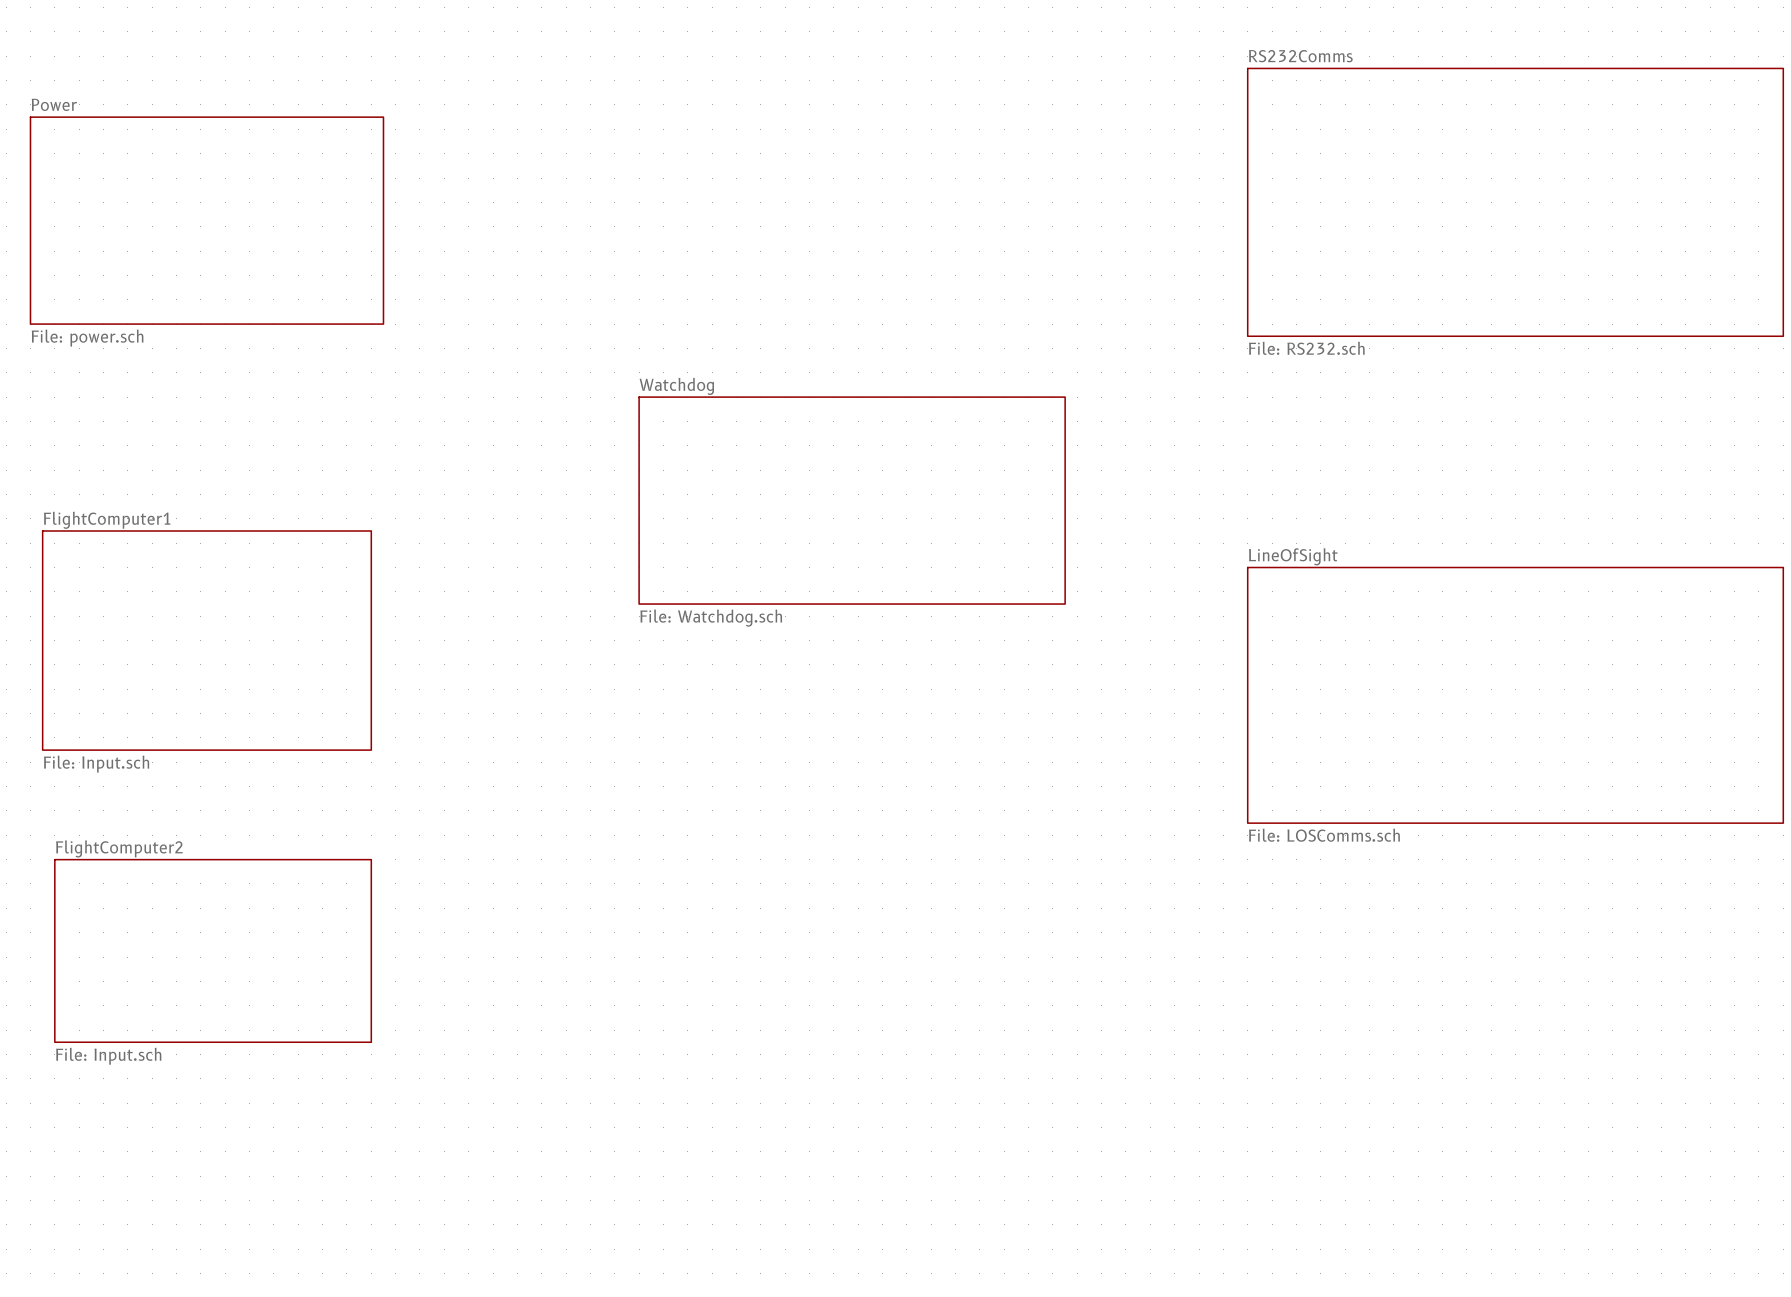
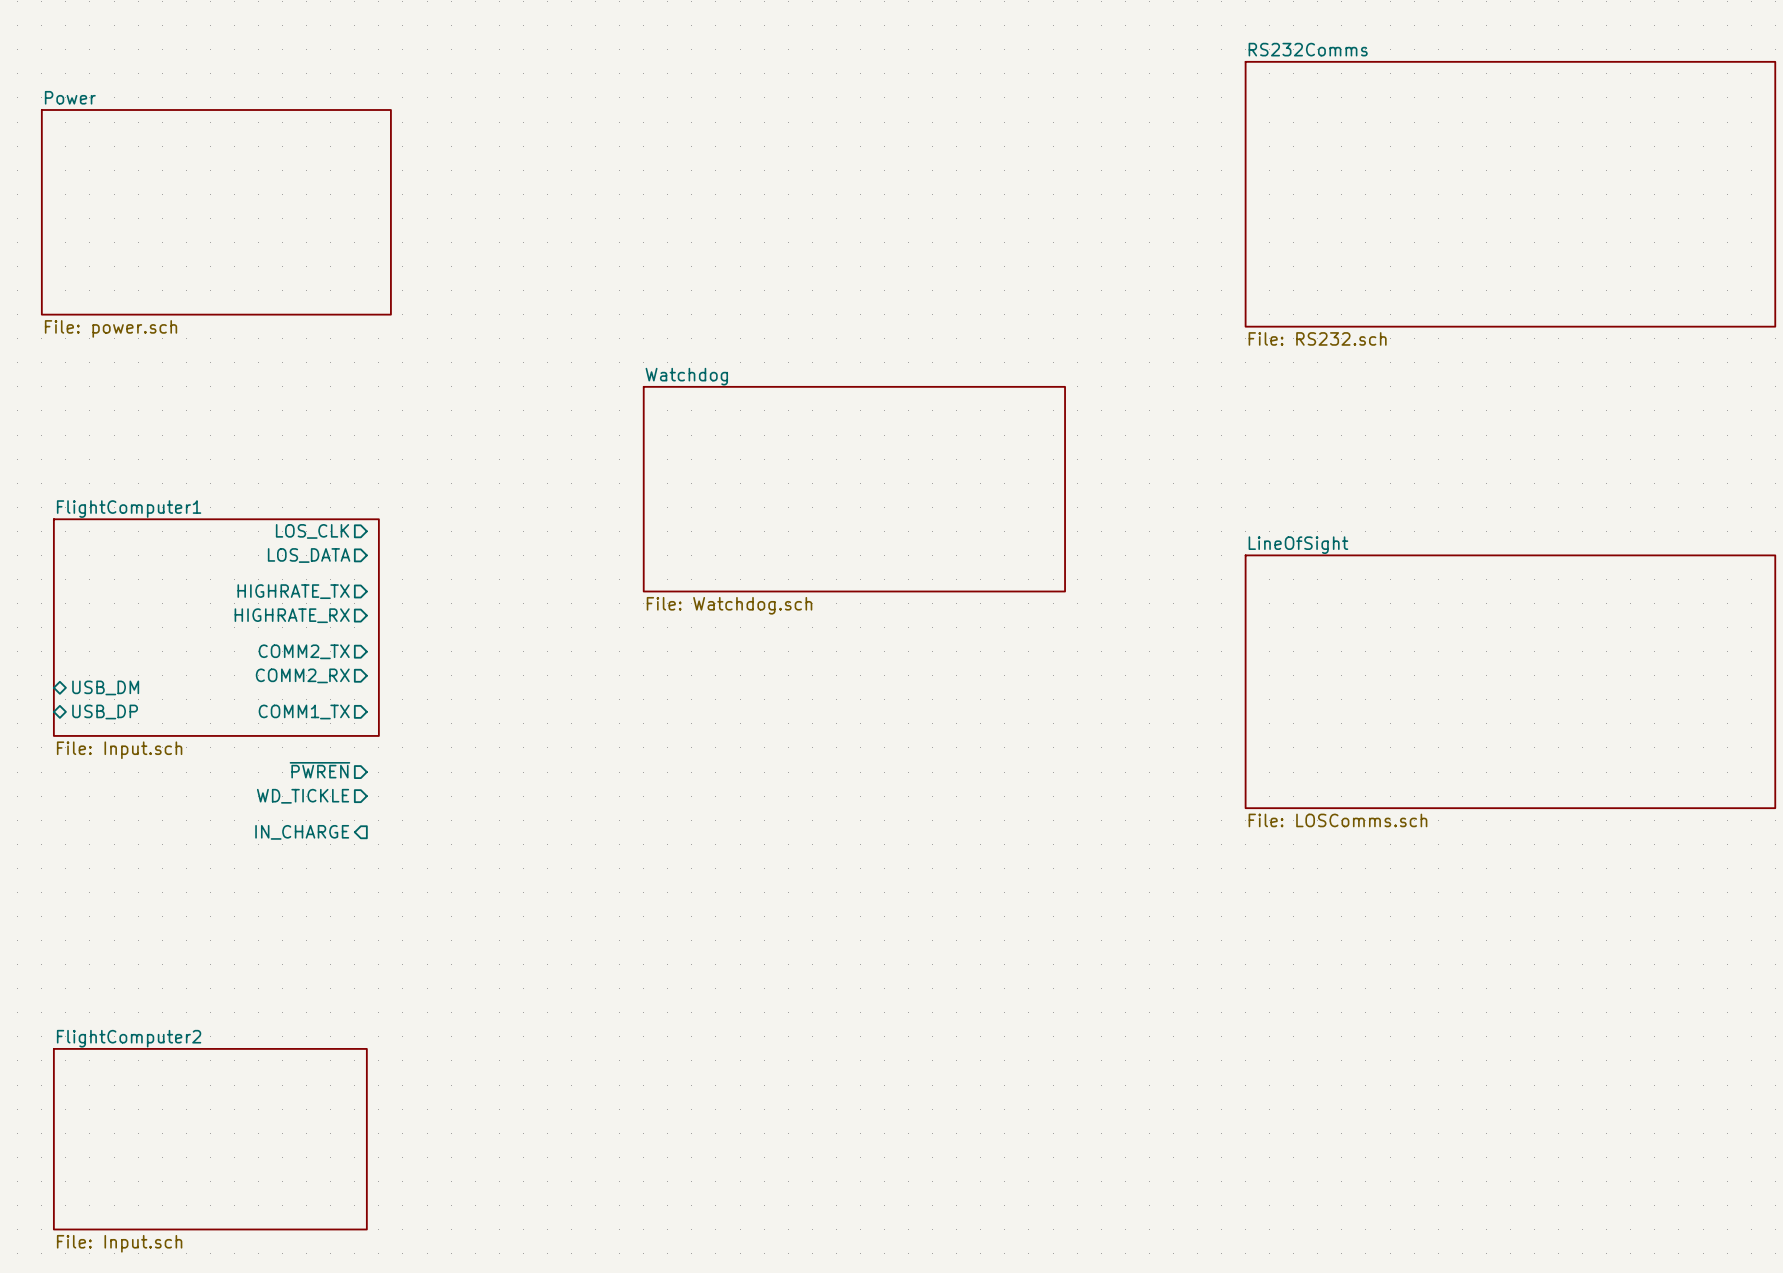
sheet pin: none -> LOS_CLK (312, 531)
sheet pin: none -> LOS_DATA (309, 555)
sheet pin: none -> HIGHRATE_TX (293, 591)
sheet pin: none -> HIGHRATE_RX (292, 615)
sheet pin: none -> COMM2_TX (304, 651)
sheet pin: none -> COMM2_RX (302, 675)
sheet pin: none -> USB_DM (105, 687)
sheet pin: none -> USB_DP (105, 712)
sheet pin: none -> COMM1_TX (304, 712)
sheet pin: none -> ~{PWREN} (319, 770)
sheet pin: none -> WD_TICKLE (303, 796)
sheet pin: none -> IN_CHARGE (302, 832)
sheet FlightComputer2 position: (213, 950) -> (210, 1139)

